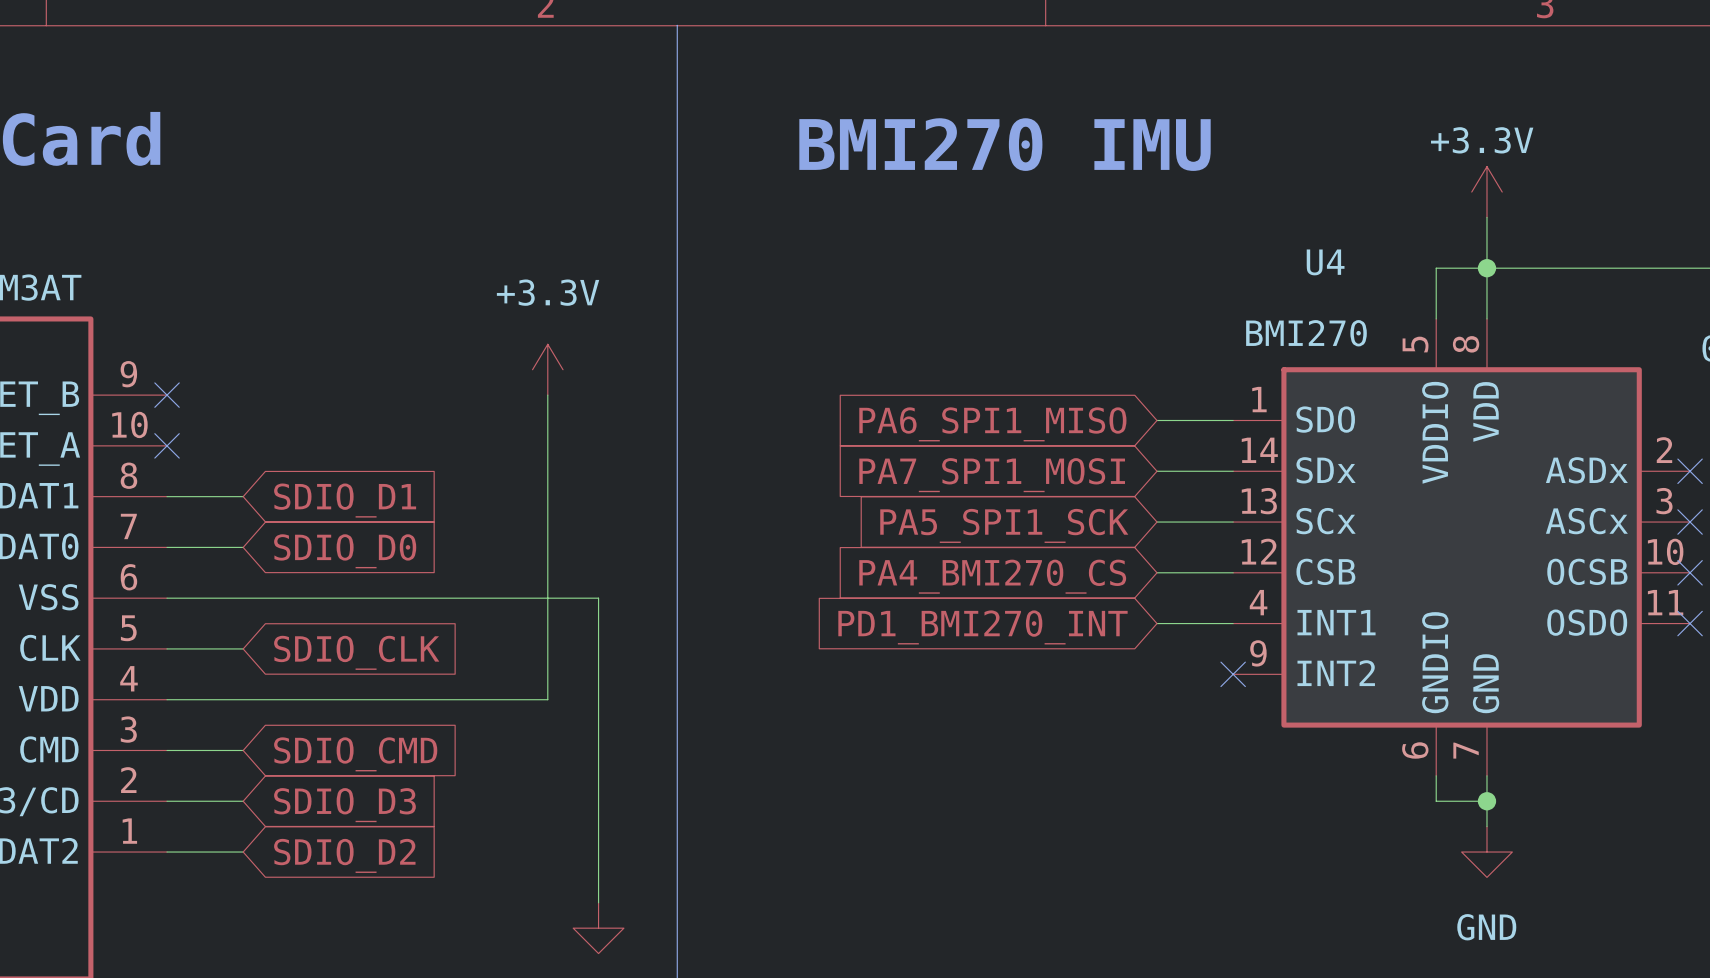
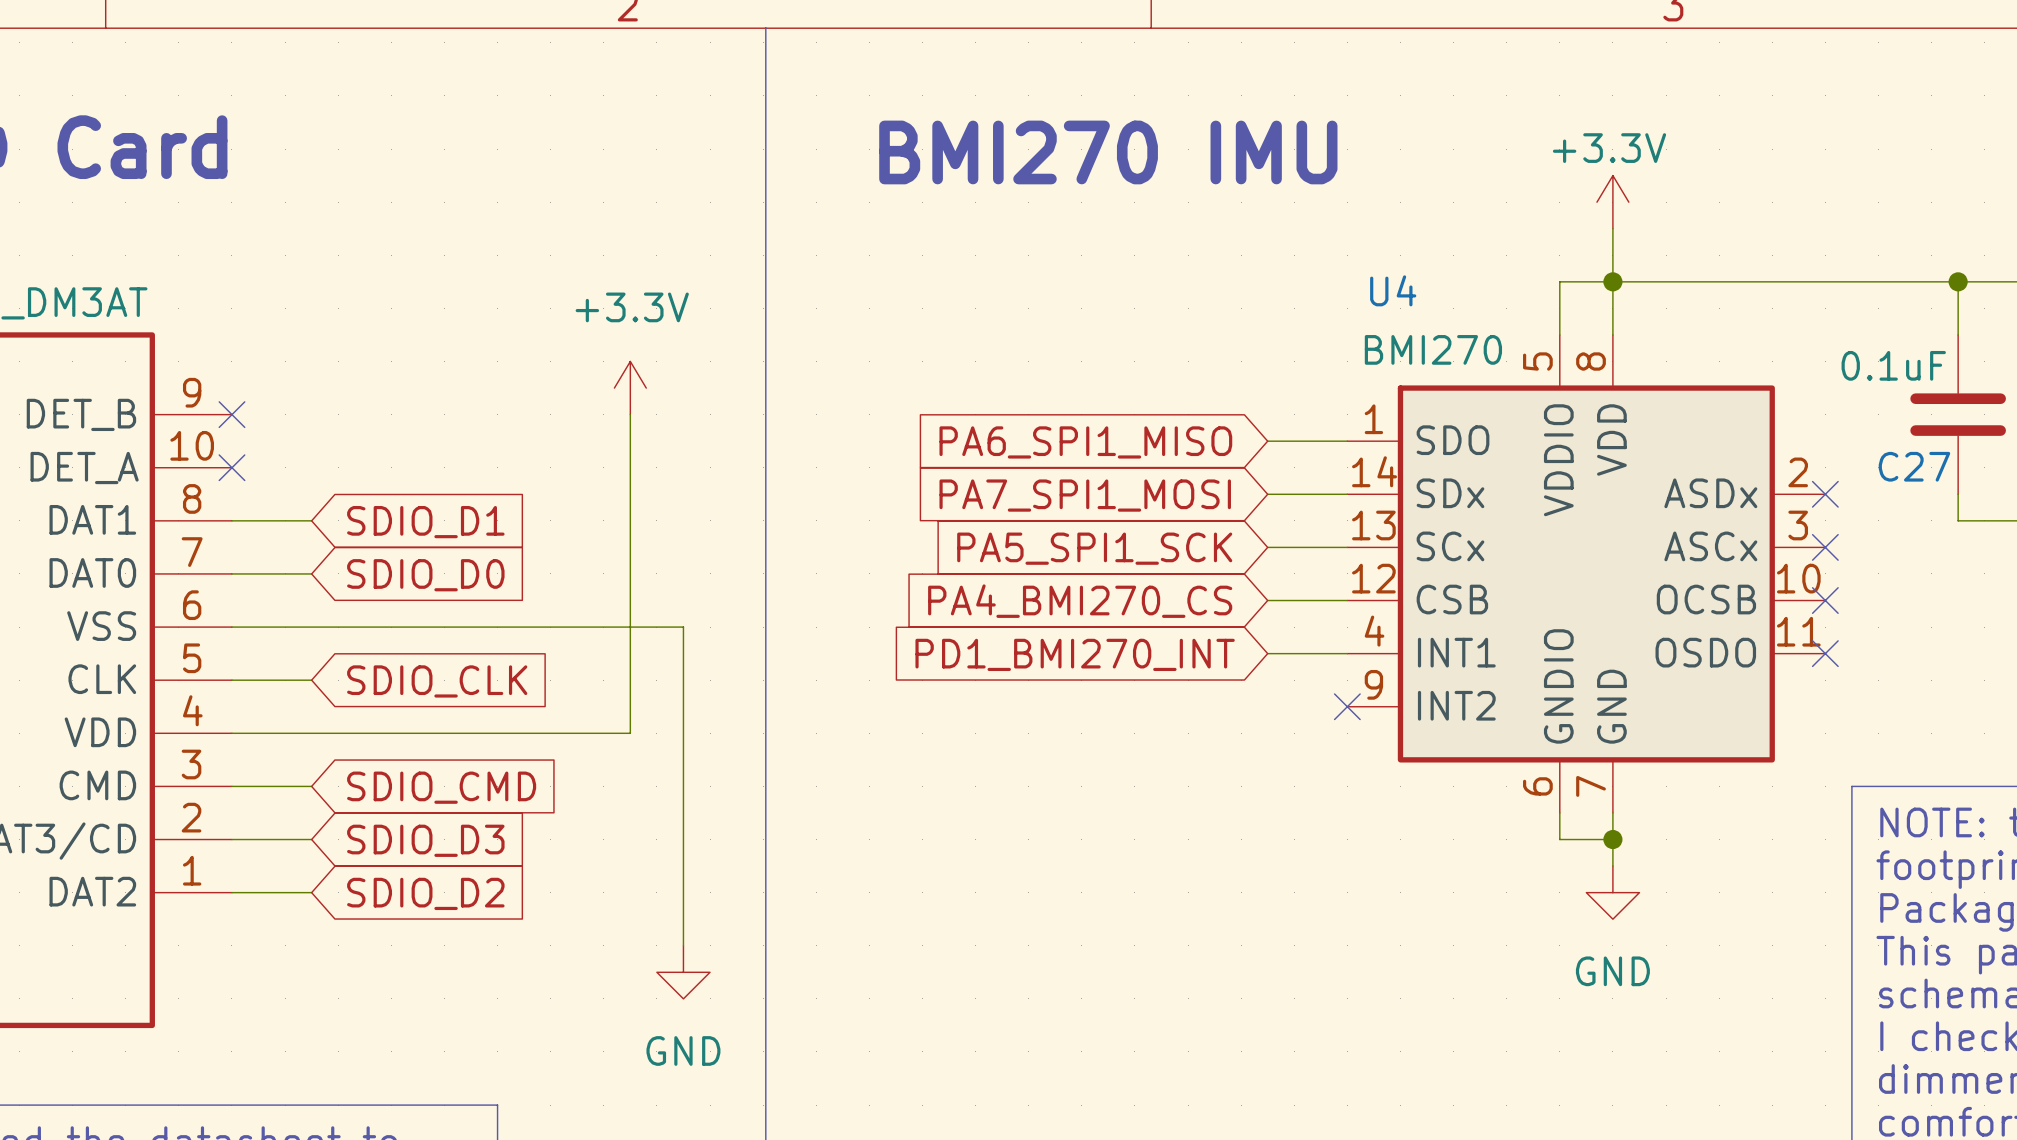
U4 name position: U4 (1325, 262) -> U4 (1393, 290)

